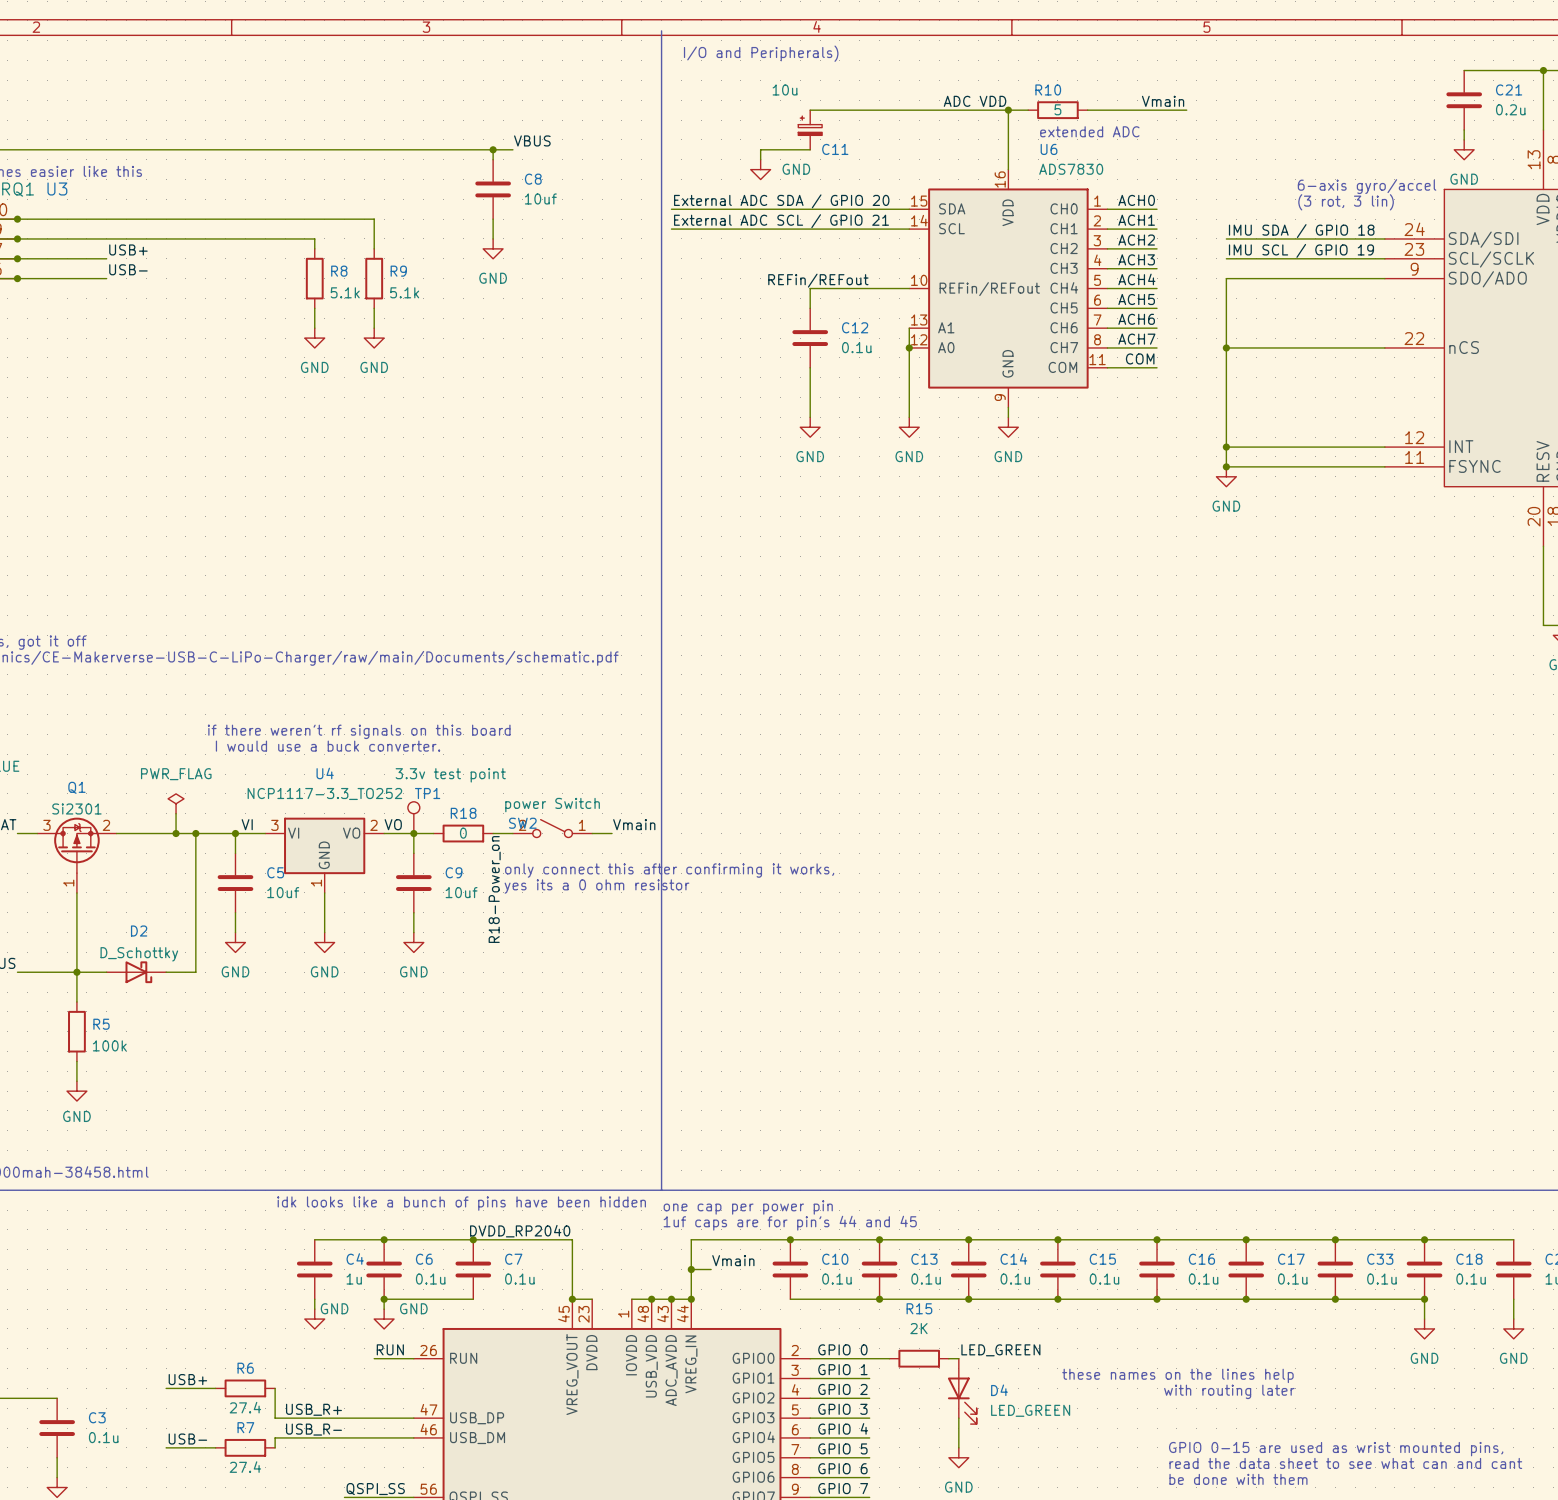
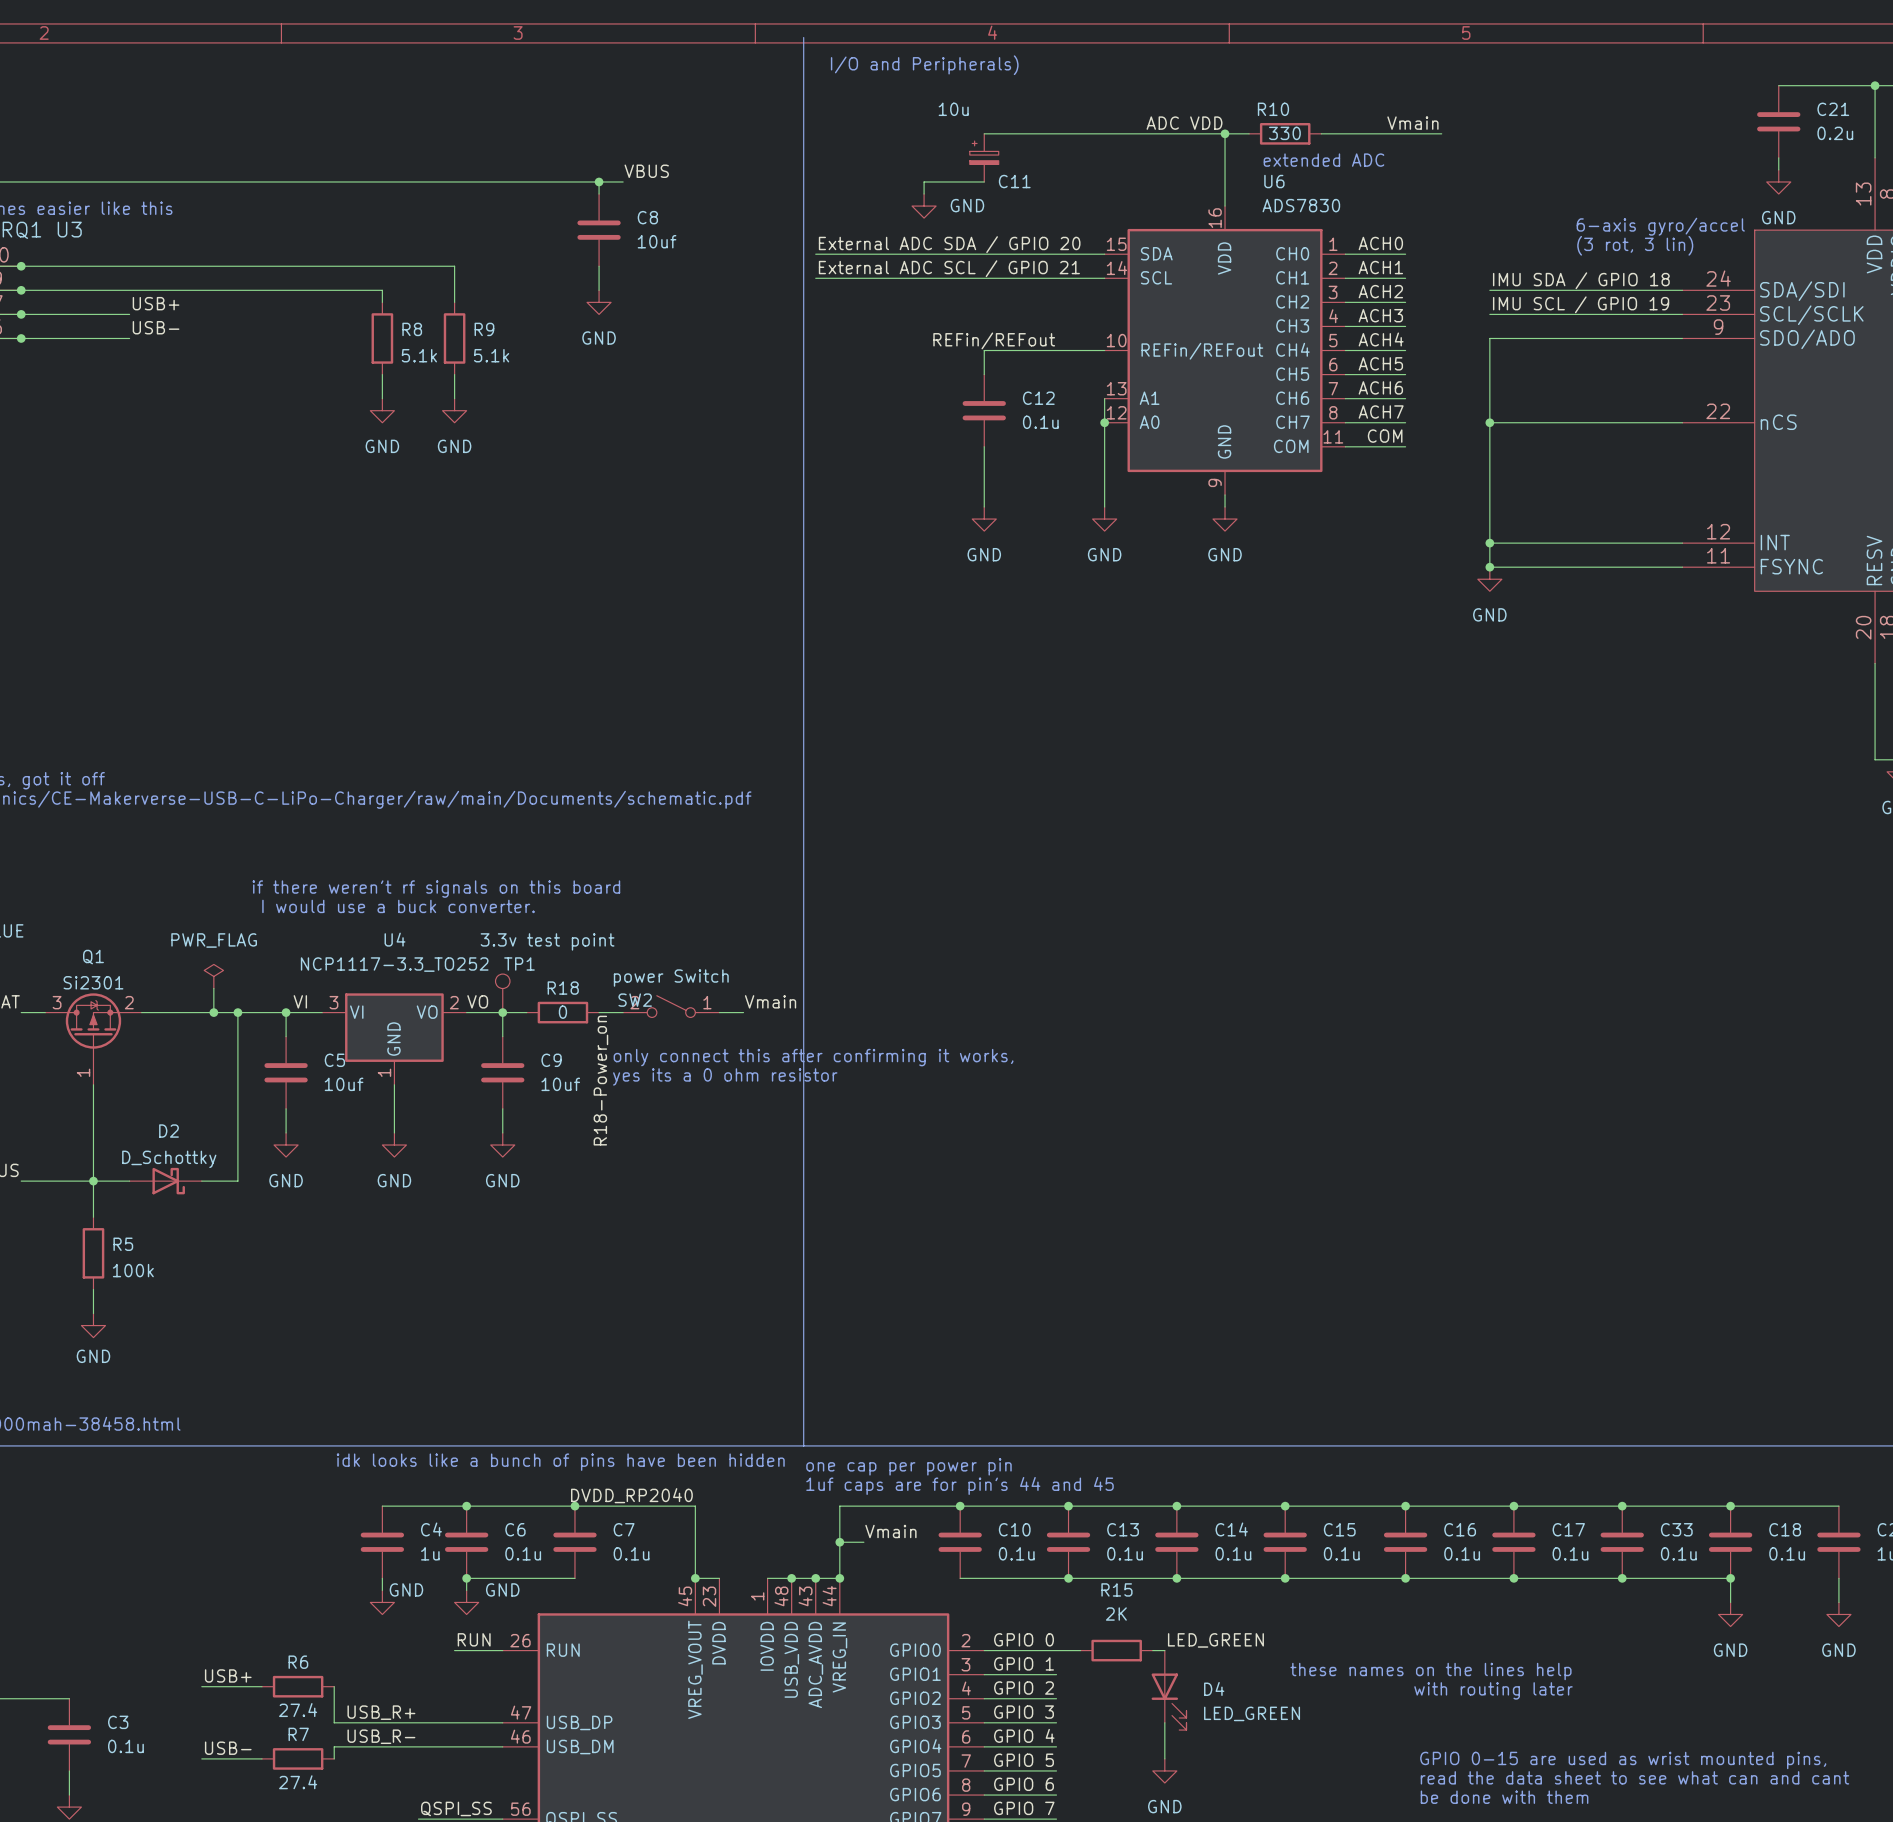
R10 value: 5 (1057, 109) -> 330 (1284, 133)

